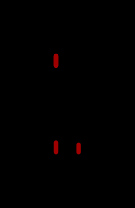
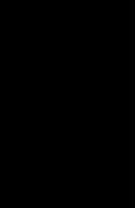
top track: (55, 55) (55, 65) -> none
top track: (55, 142) (55, 152) -> none
top track: (78, 144) (78, 152) -> none

